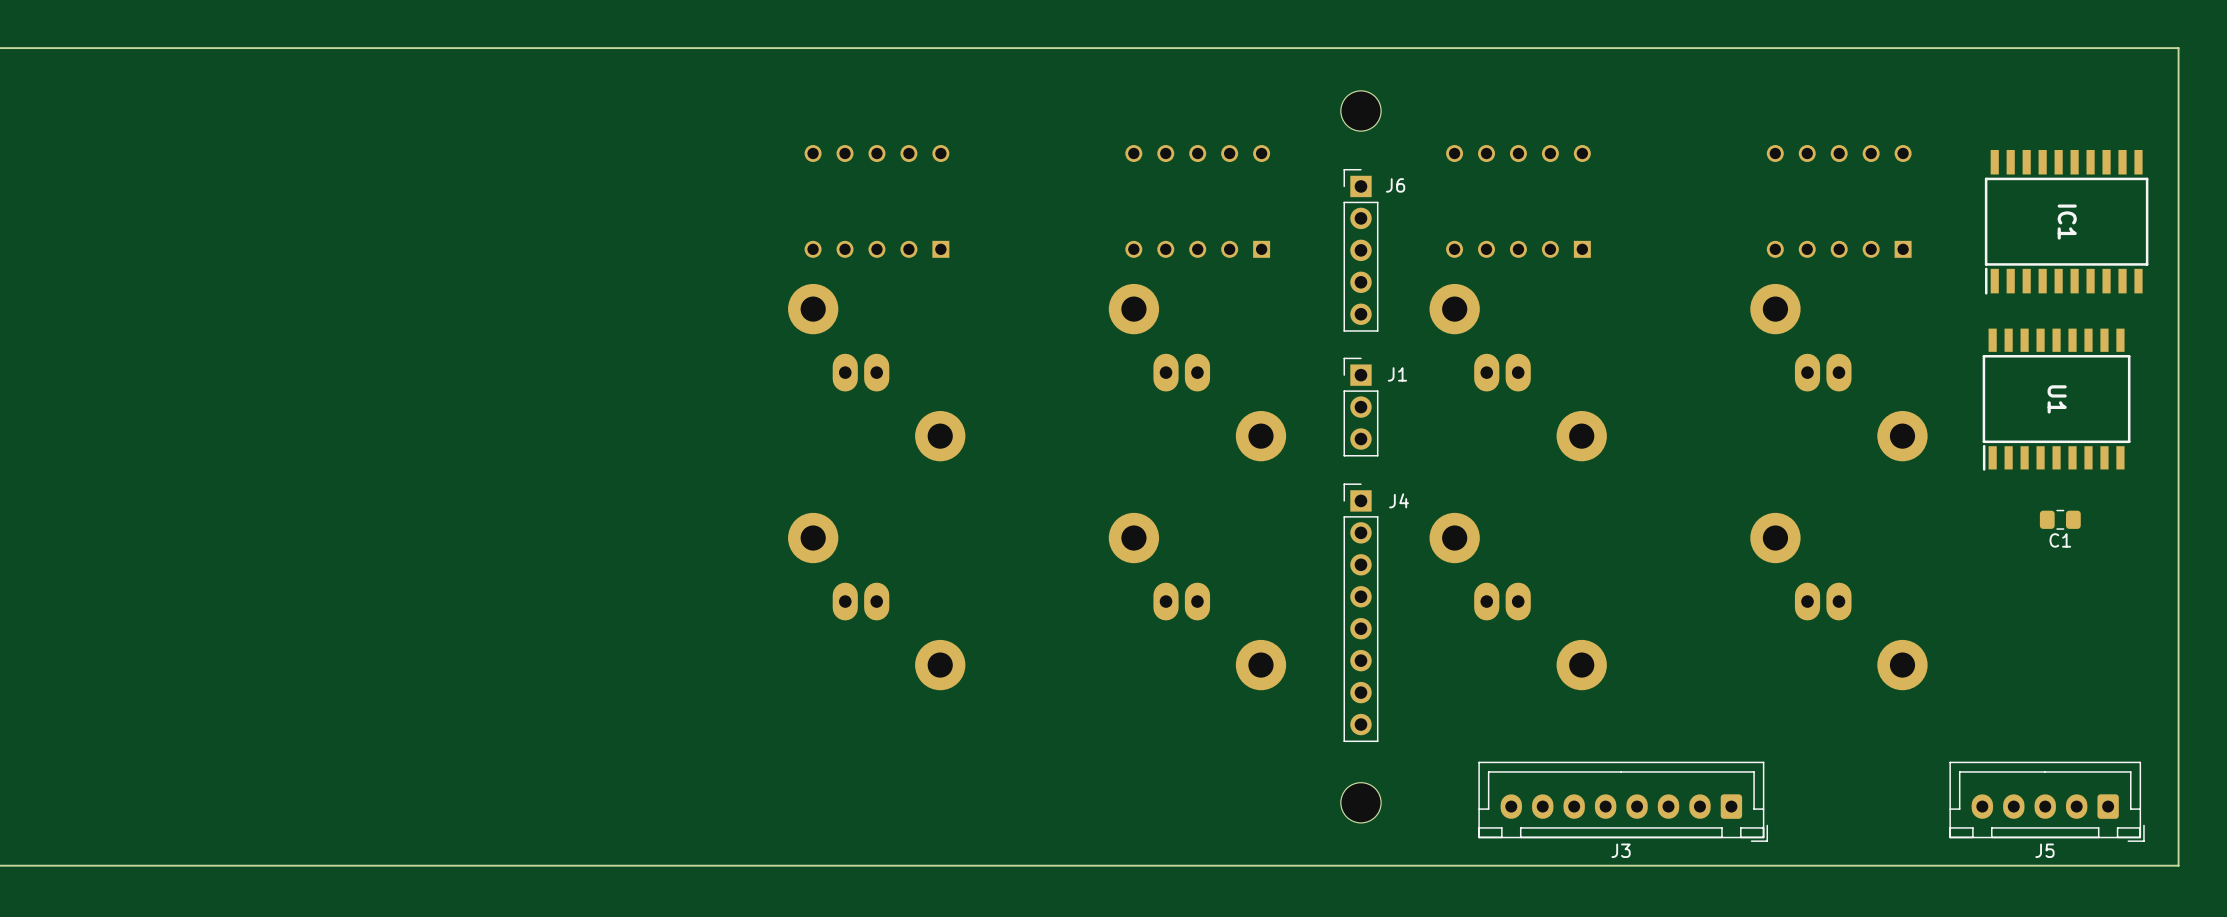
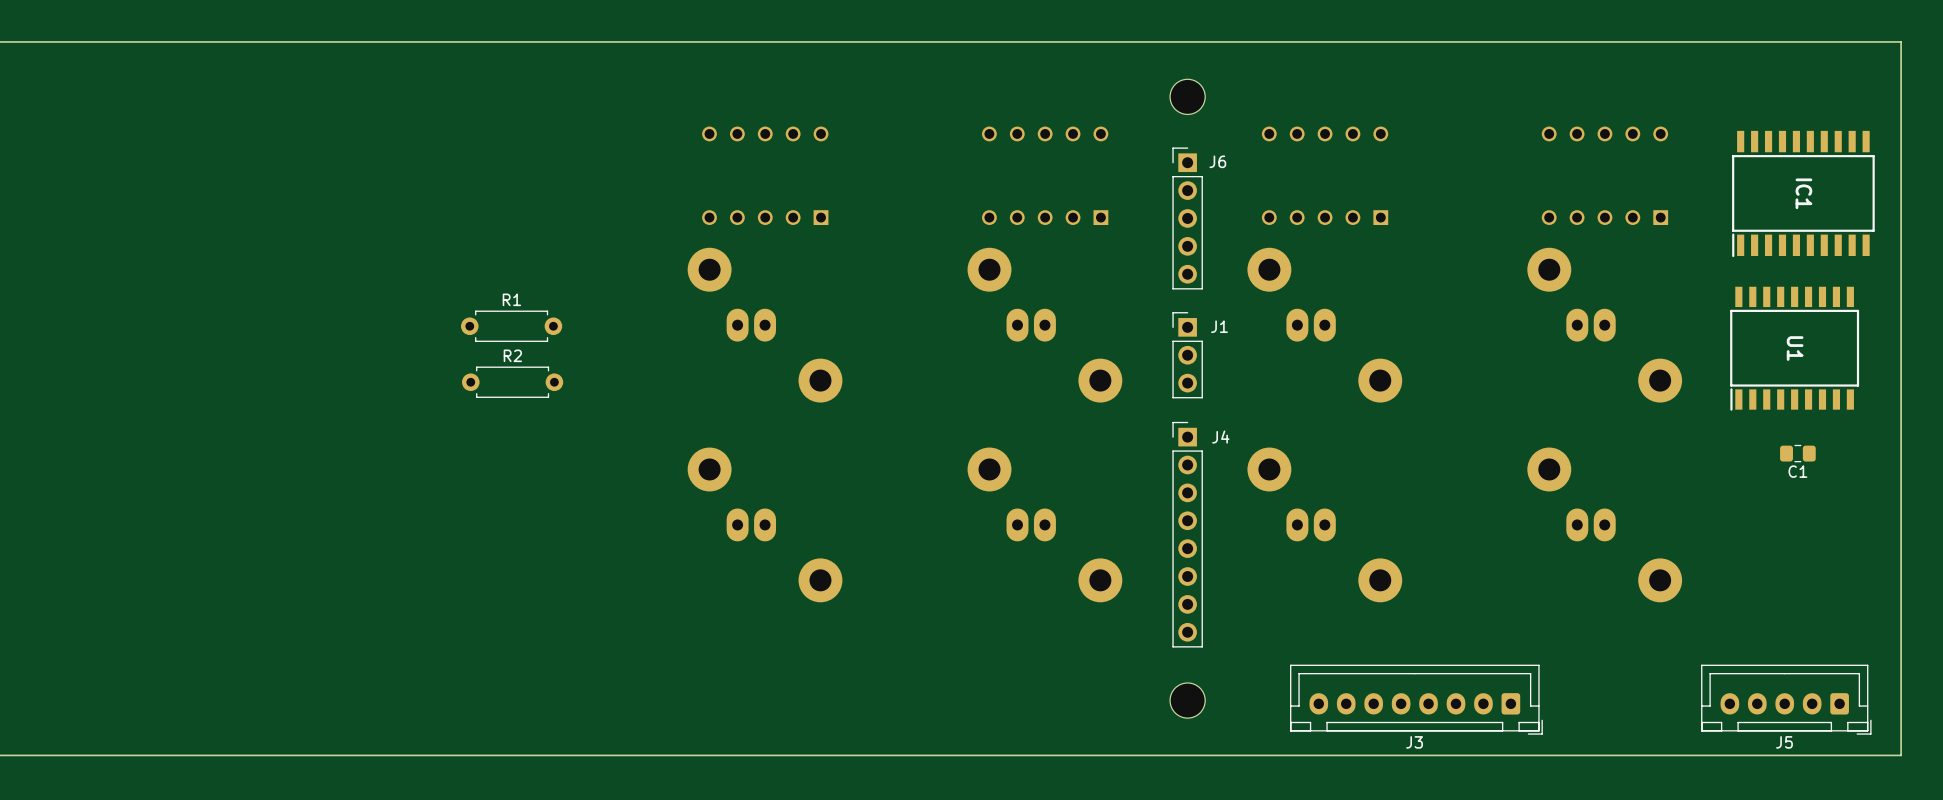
R1: none -> (511, 326)
R2: none -> (512, 382)

